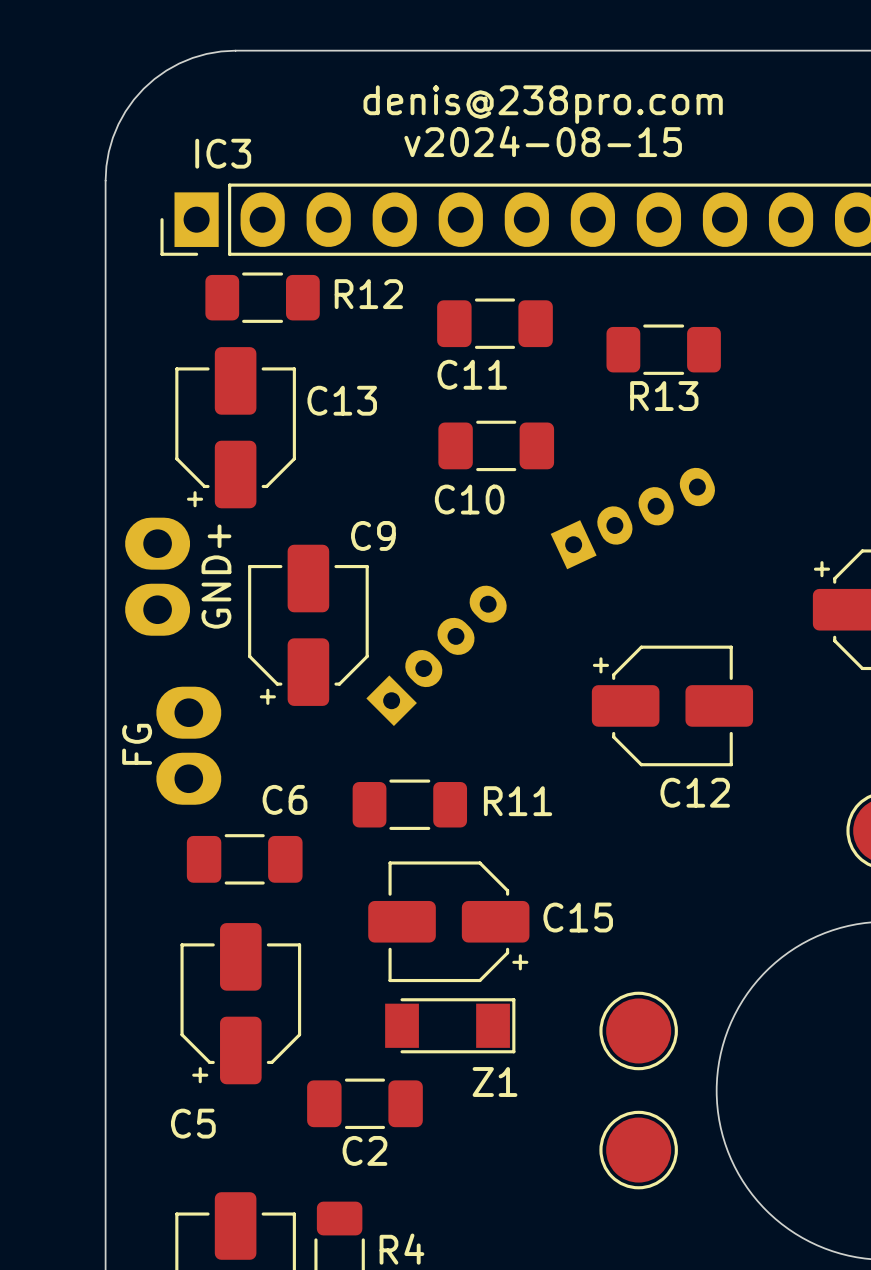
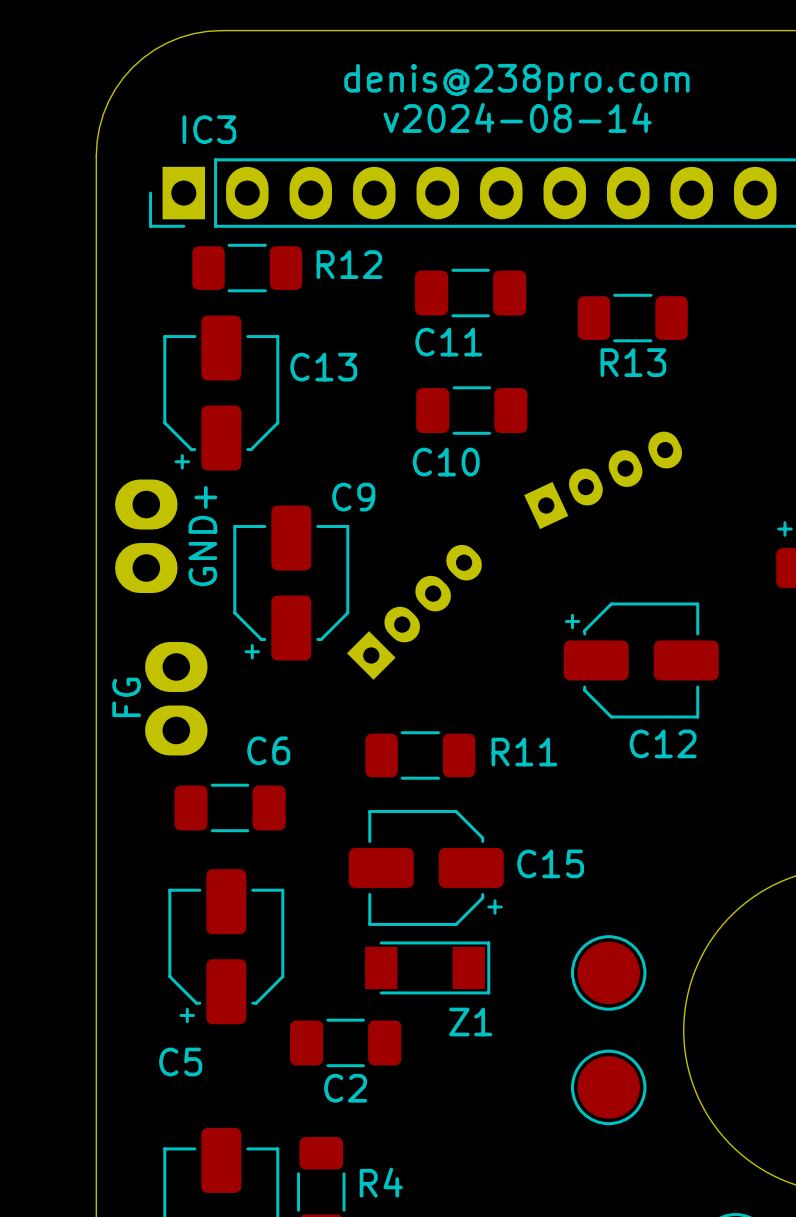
text: v2024-08-15 (543, 141) -> v2024-08-14 (517, 117)
R11 position: (409, 804) -> (420, 755)

